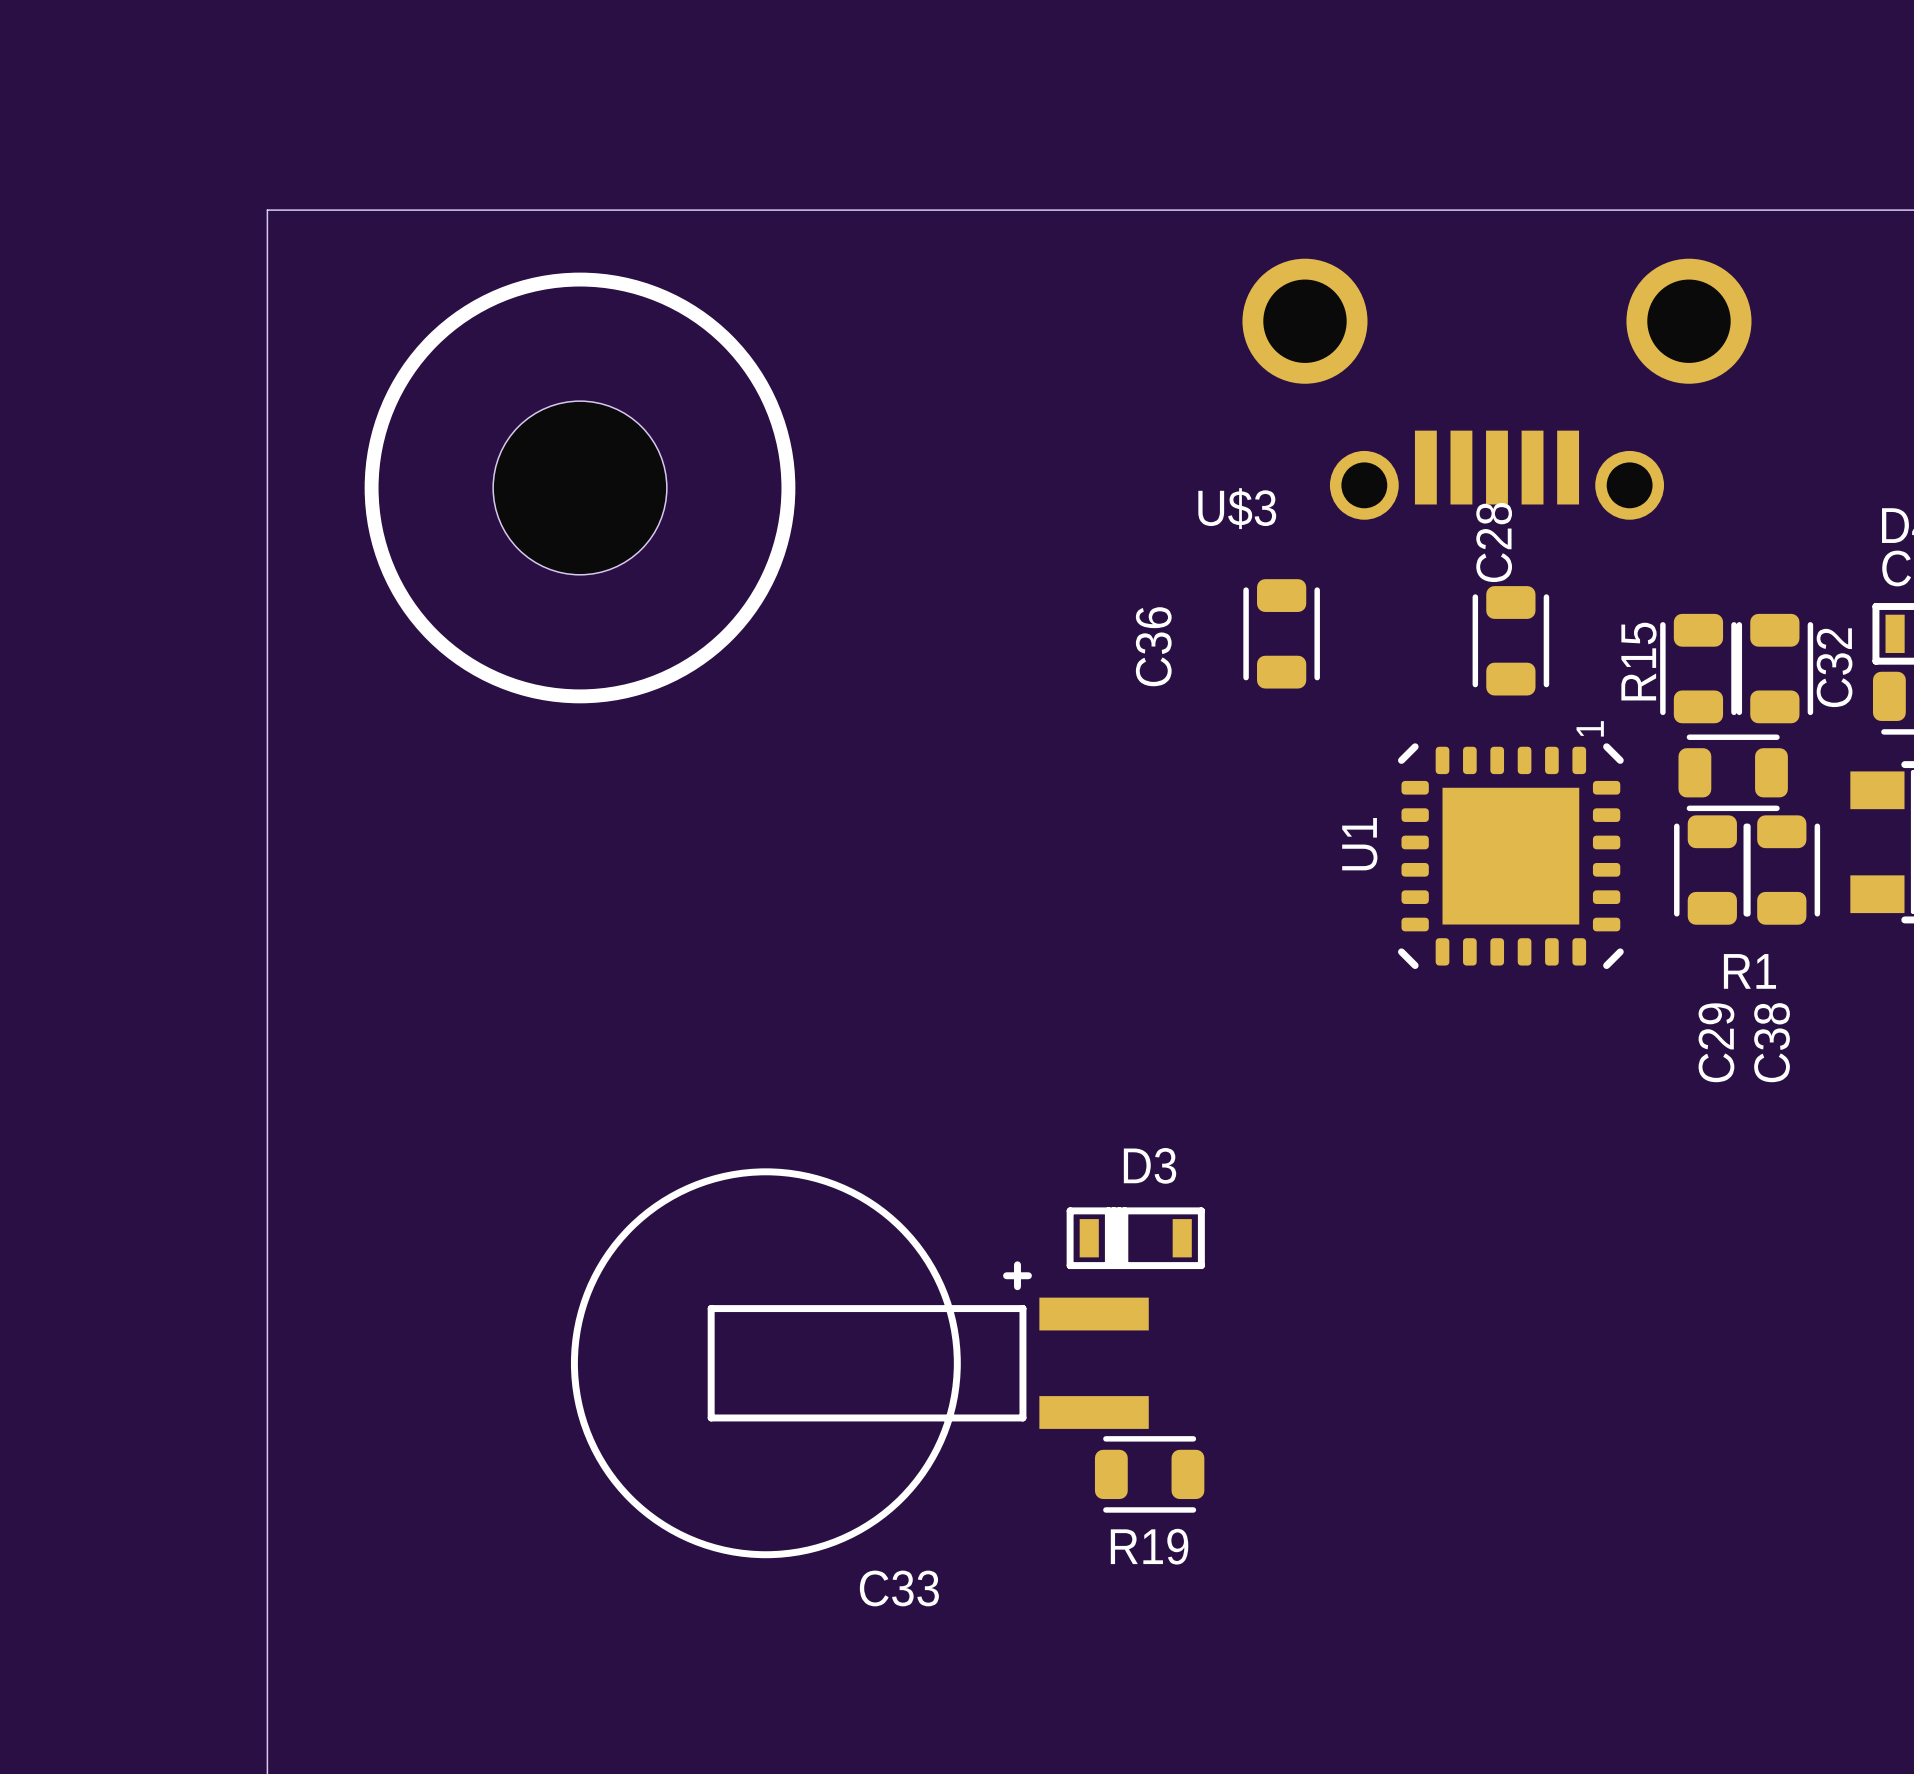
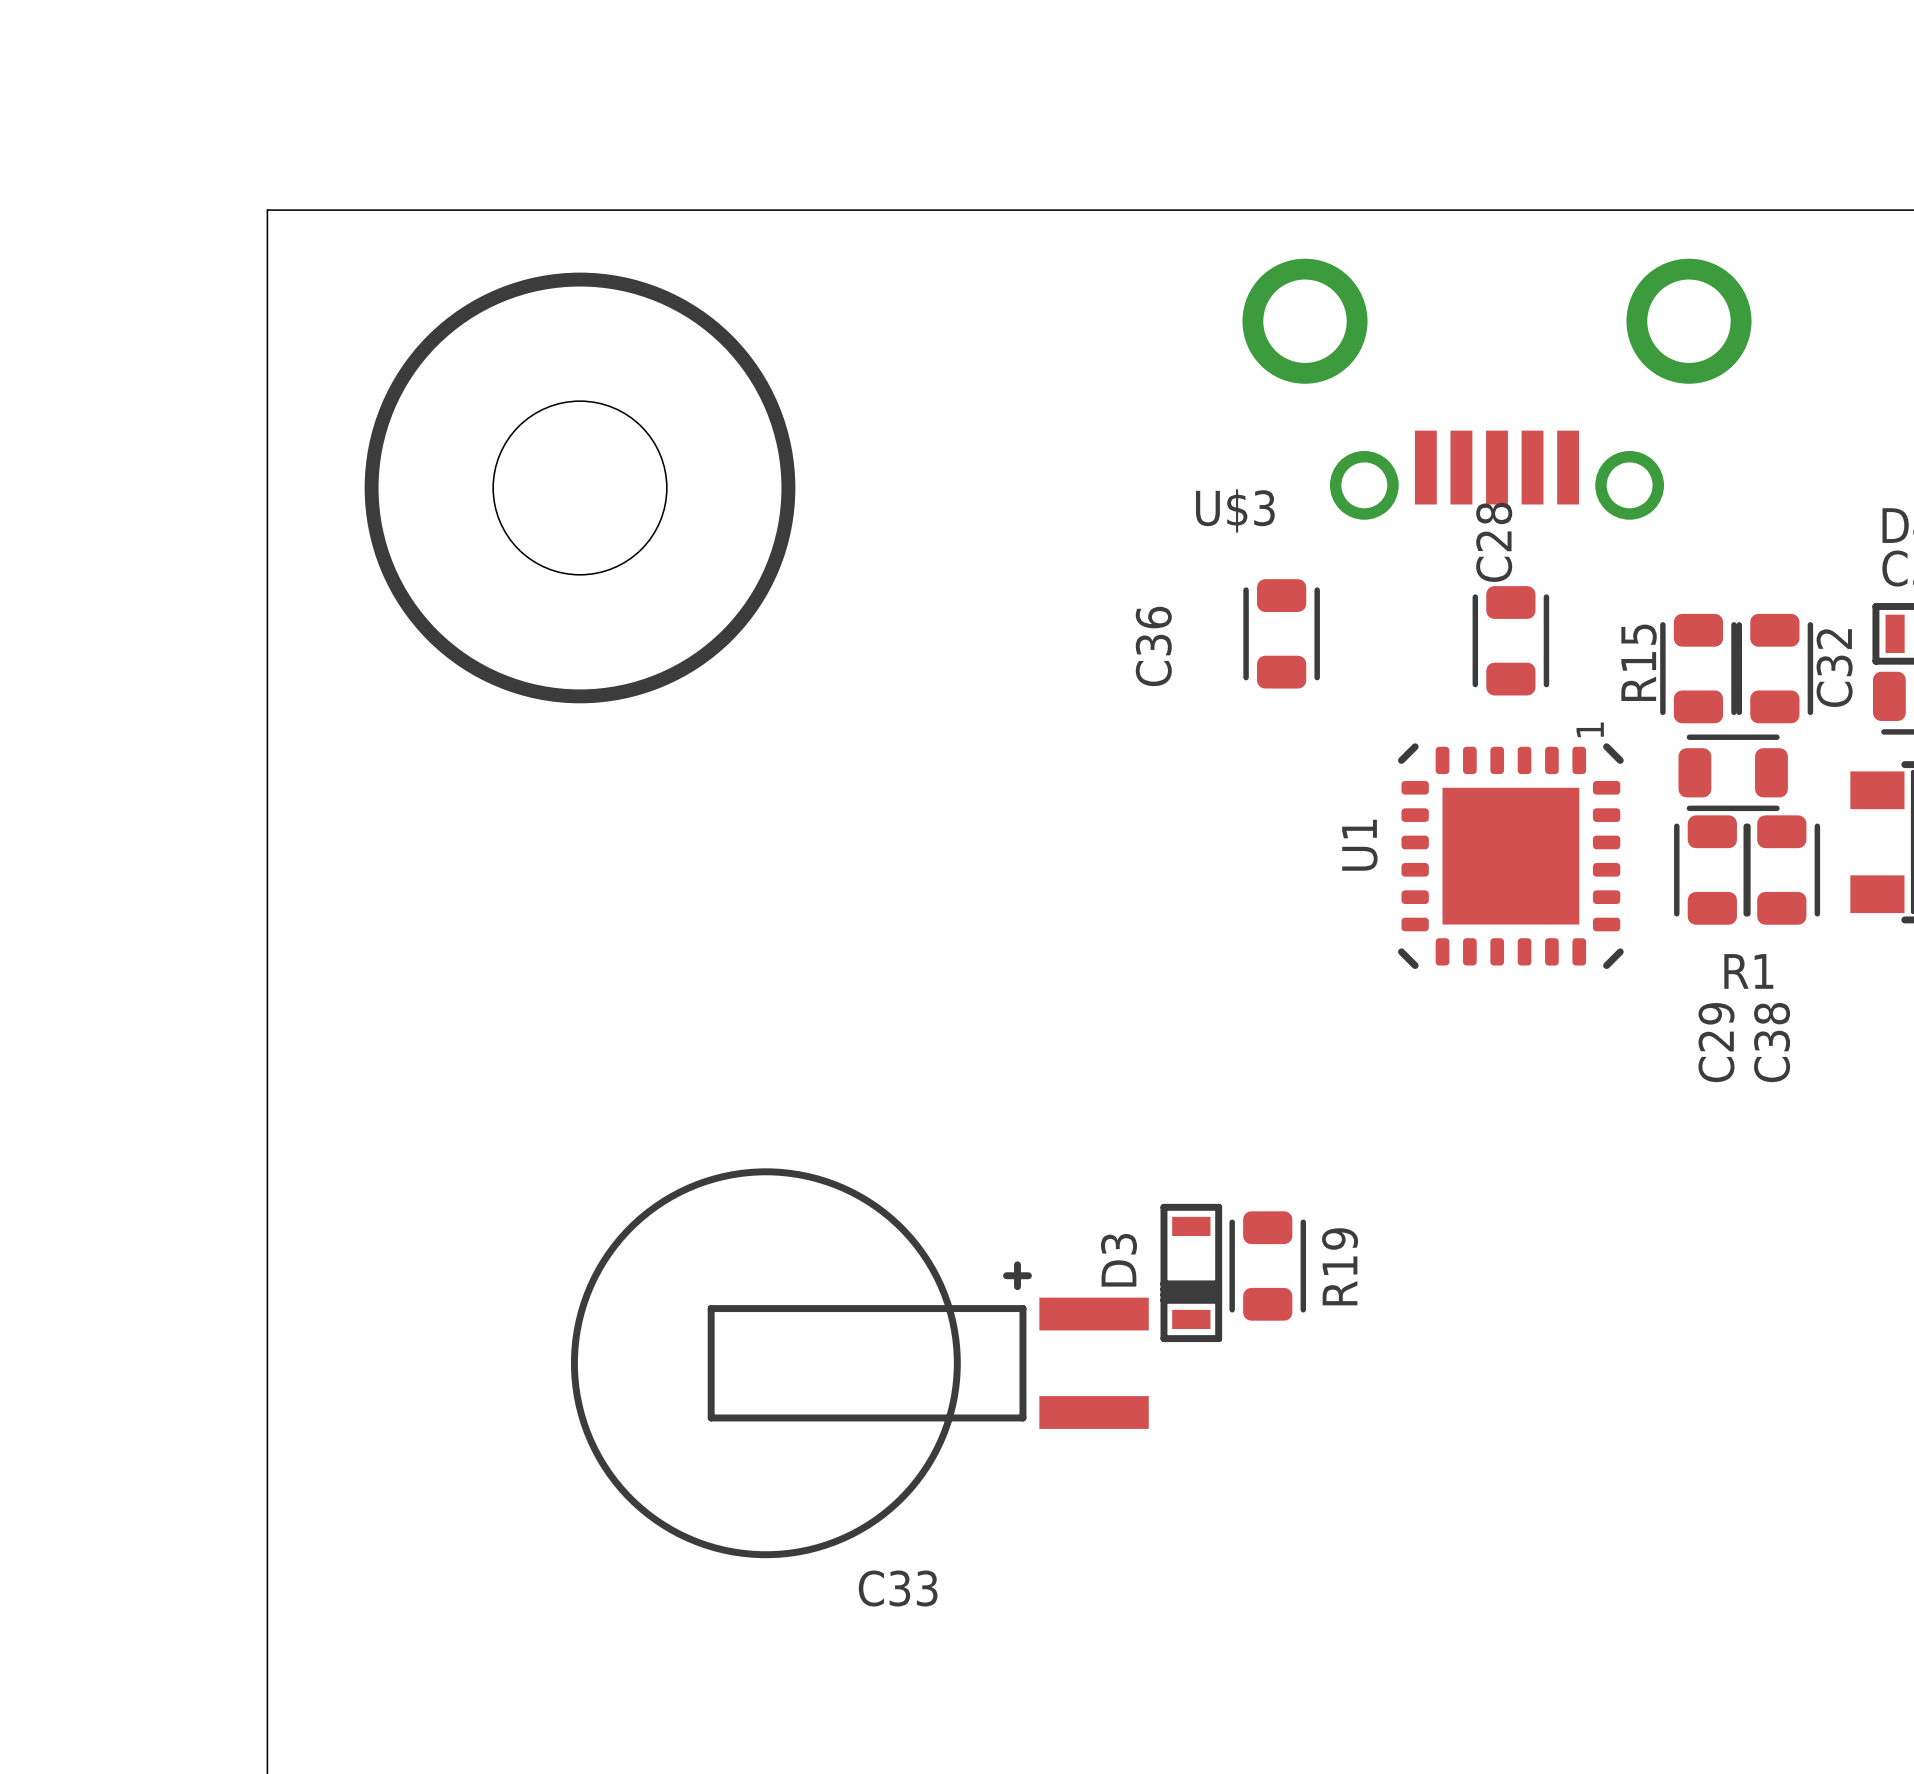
D3 rotation: 0° (1135, 1238) -> 90° counterclockwise (1191, 1272)
R19 rotation: 0° (1149, 1474) -> 90° clockwise (1267, 1266)
R19 position: (1149, 1474) -> (1267, 1266)

